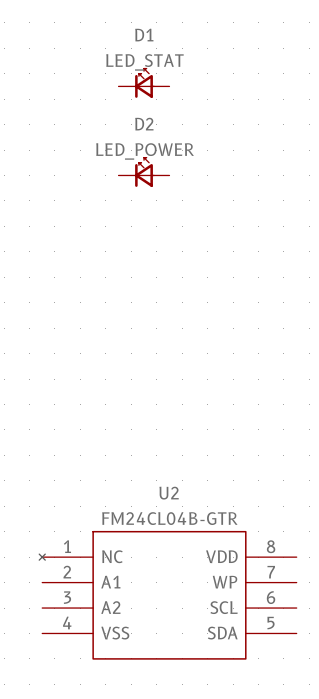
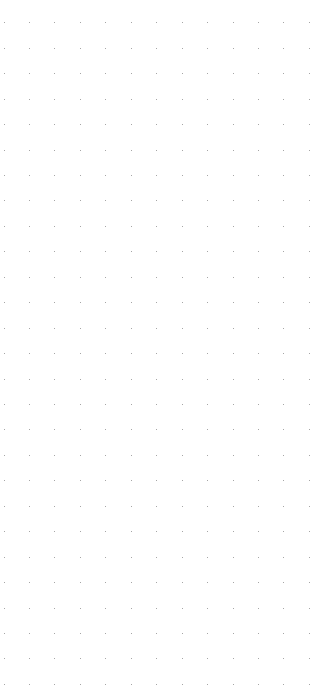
D1: LED_STAT (144, 83) -> none
D2: LED_POWER (144, 172) -> none
U2: FM24CL04B-GTR (167, 595) -> none

